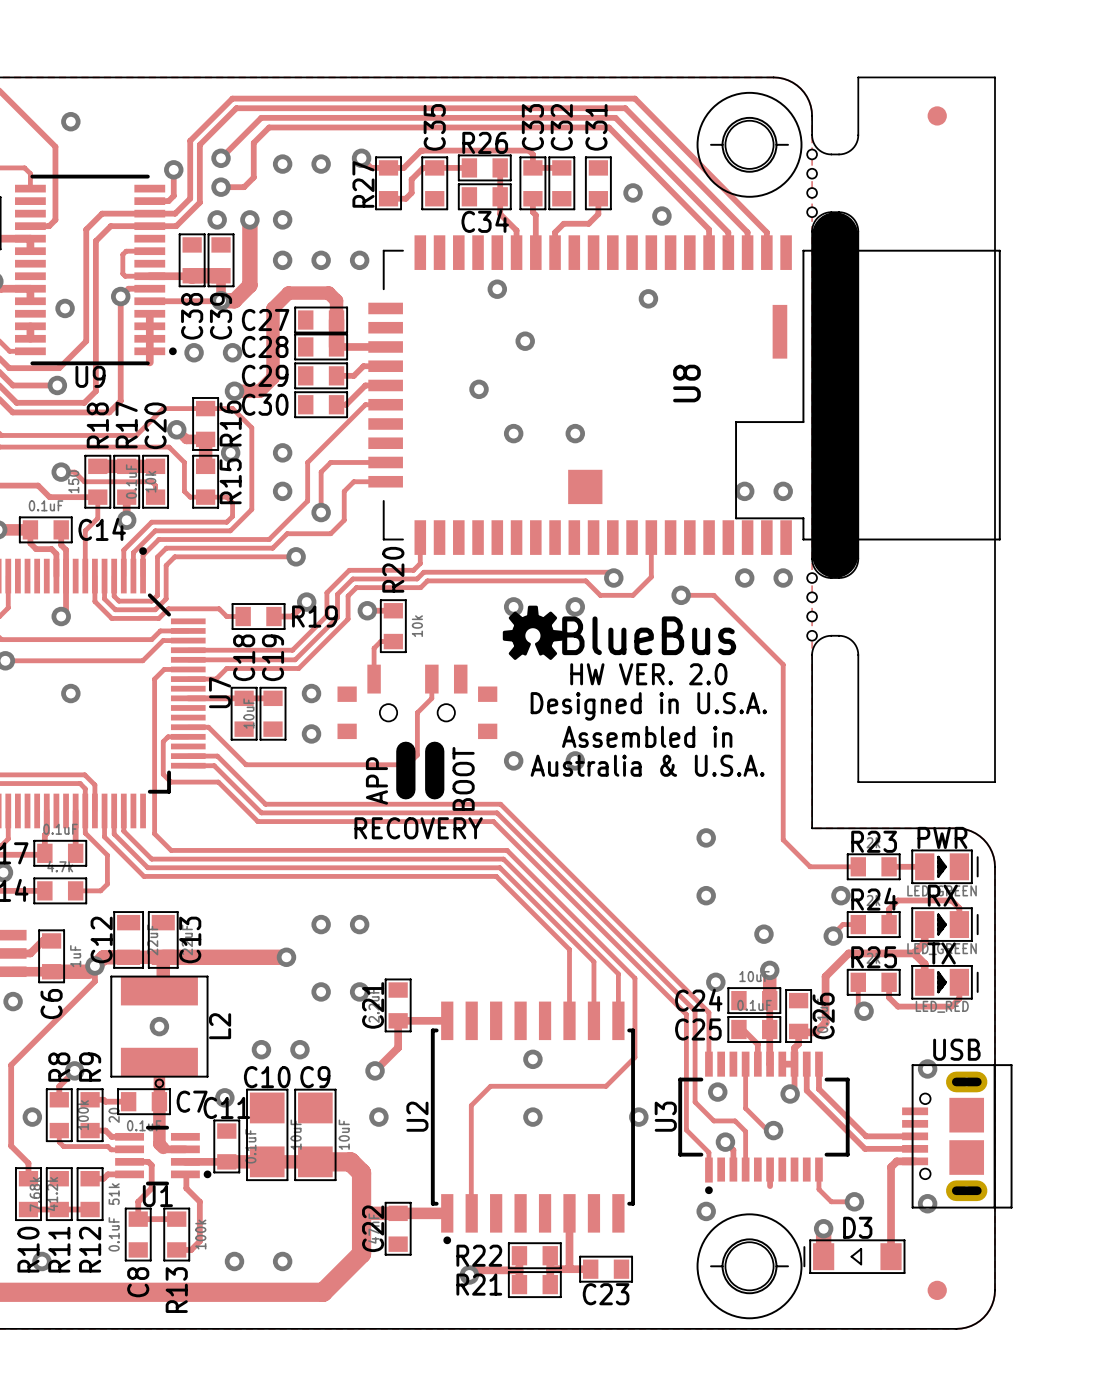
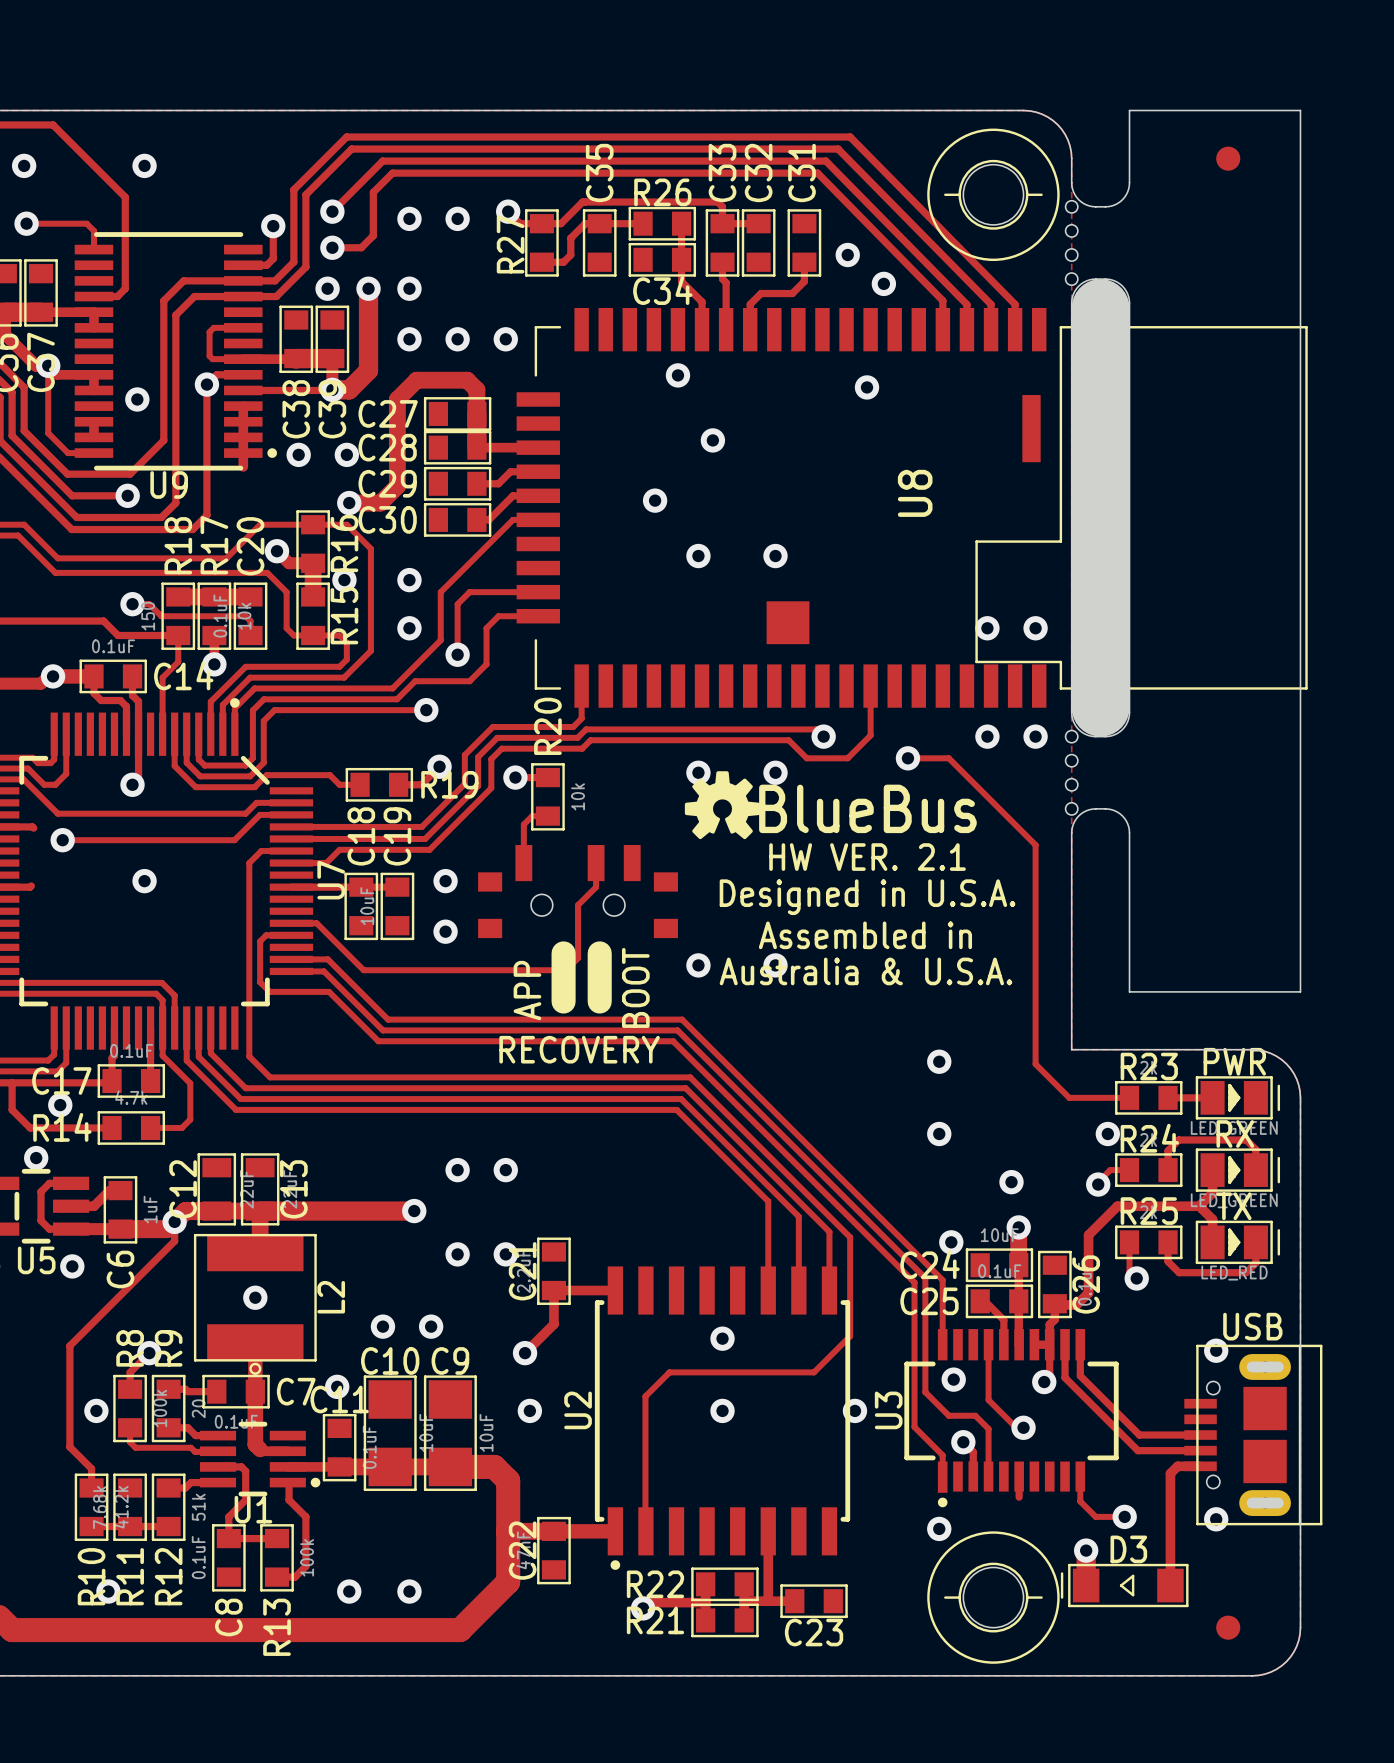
text: HW VER. 2.0 (648, 674) -> HW VER. 2.1 (867, 857)

